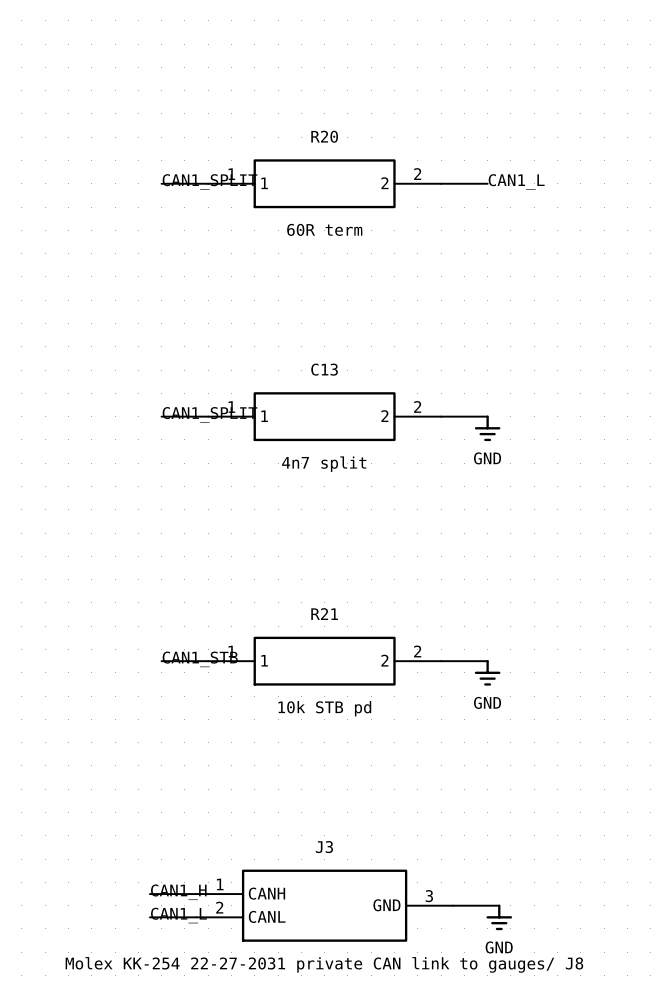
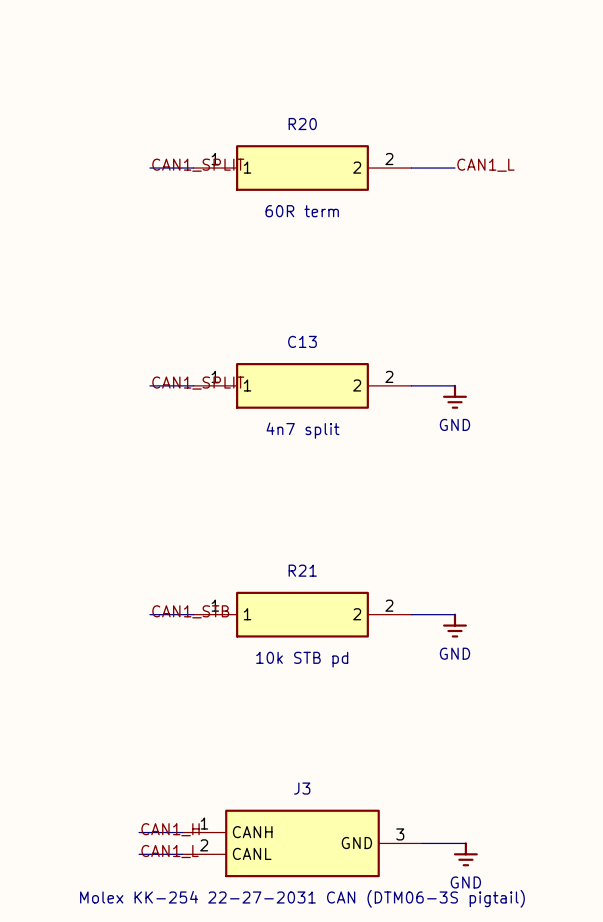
J3 value: Molex KK-254 22-27-2031 private CAN link to gauges/ J8 (324, 964) -> Molex KK-254 22-27-2031 CAN (DTM06-3S pigtail) (302, 898)

